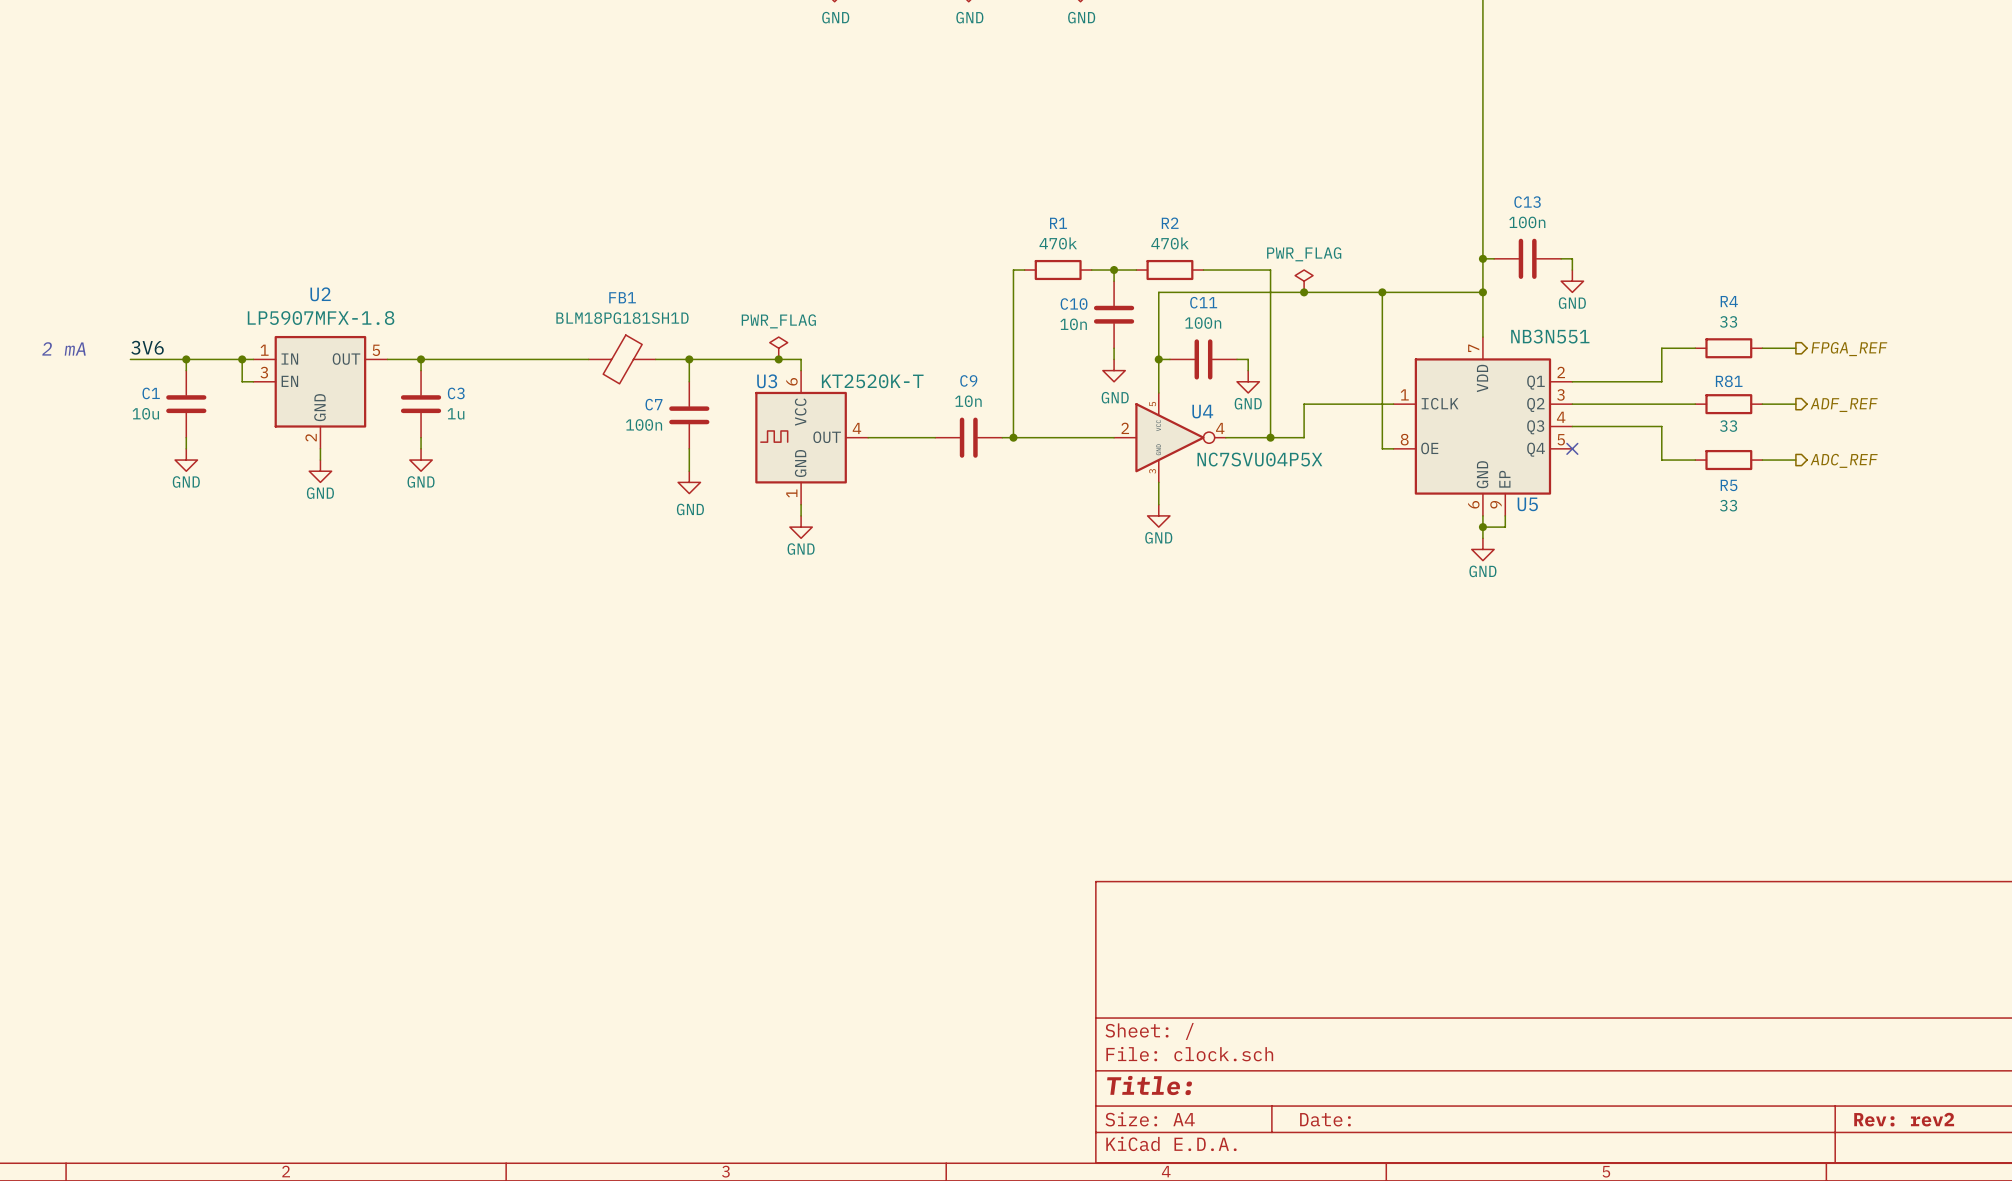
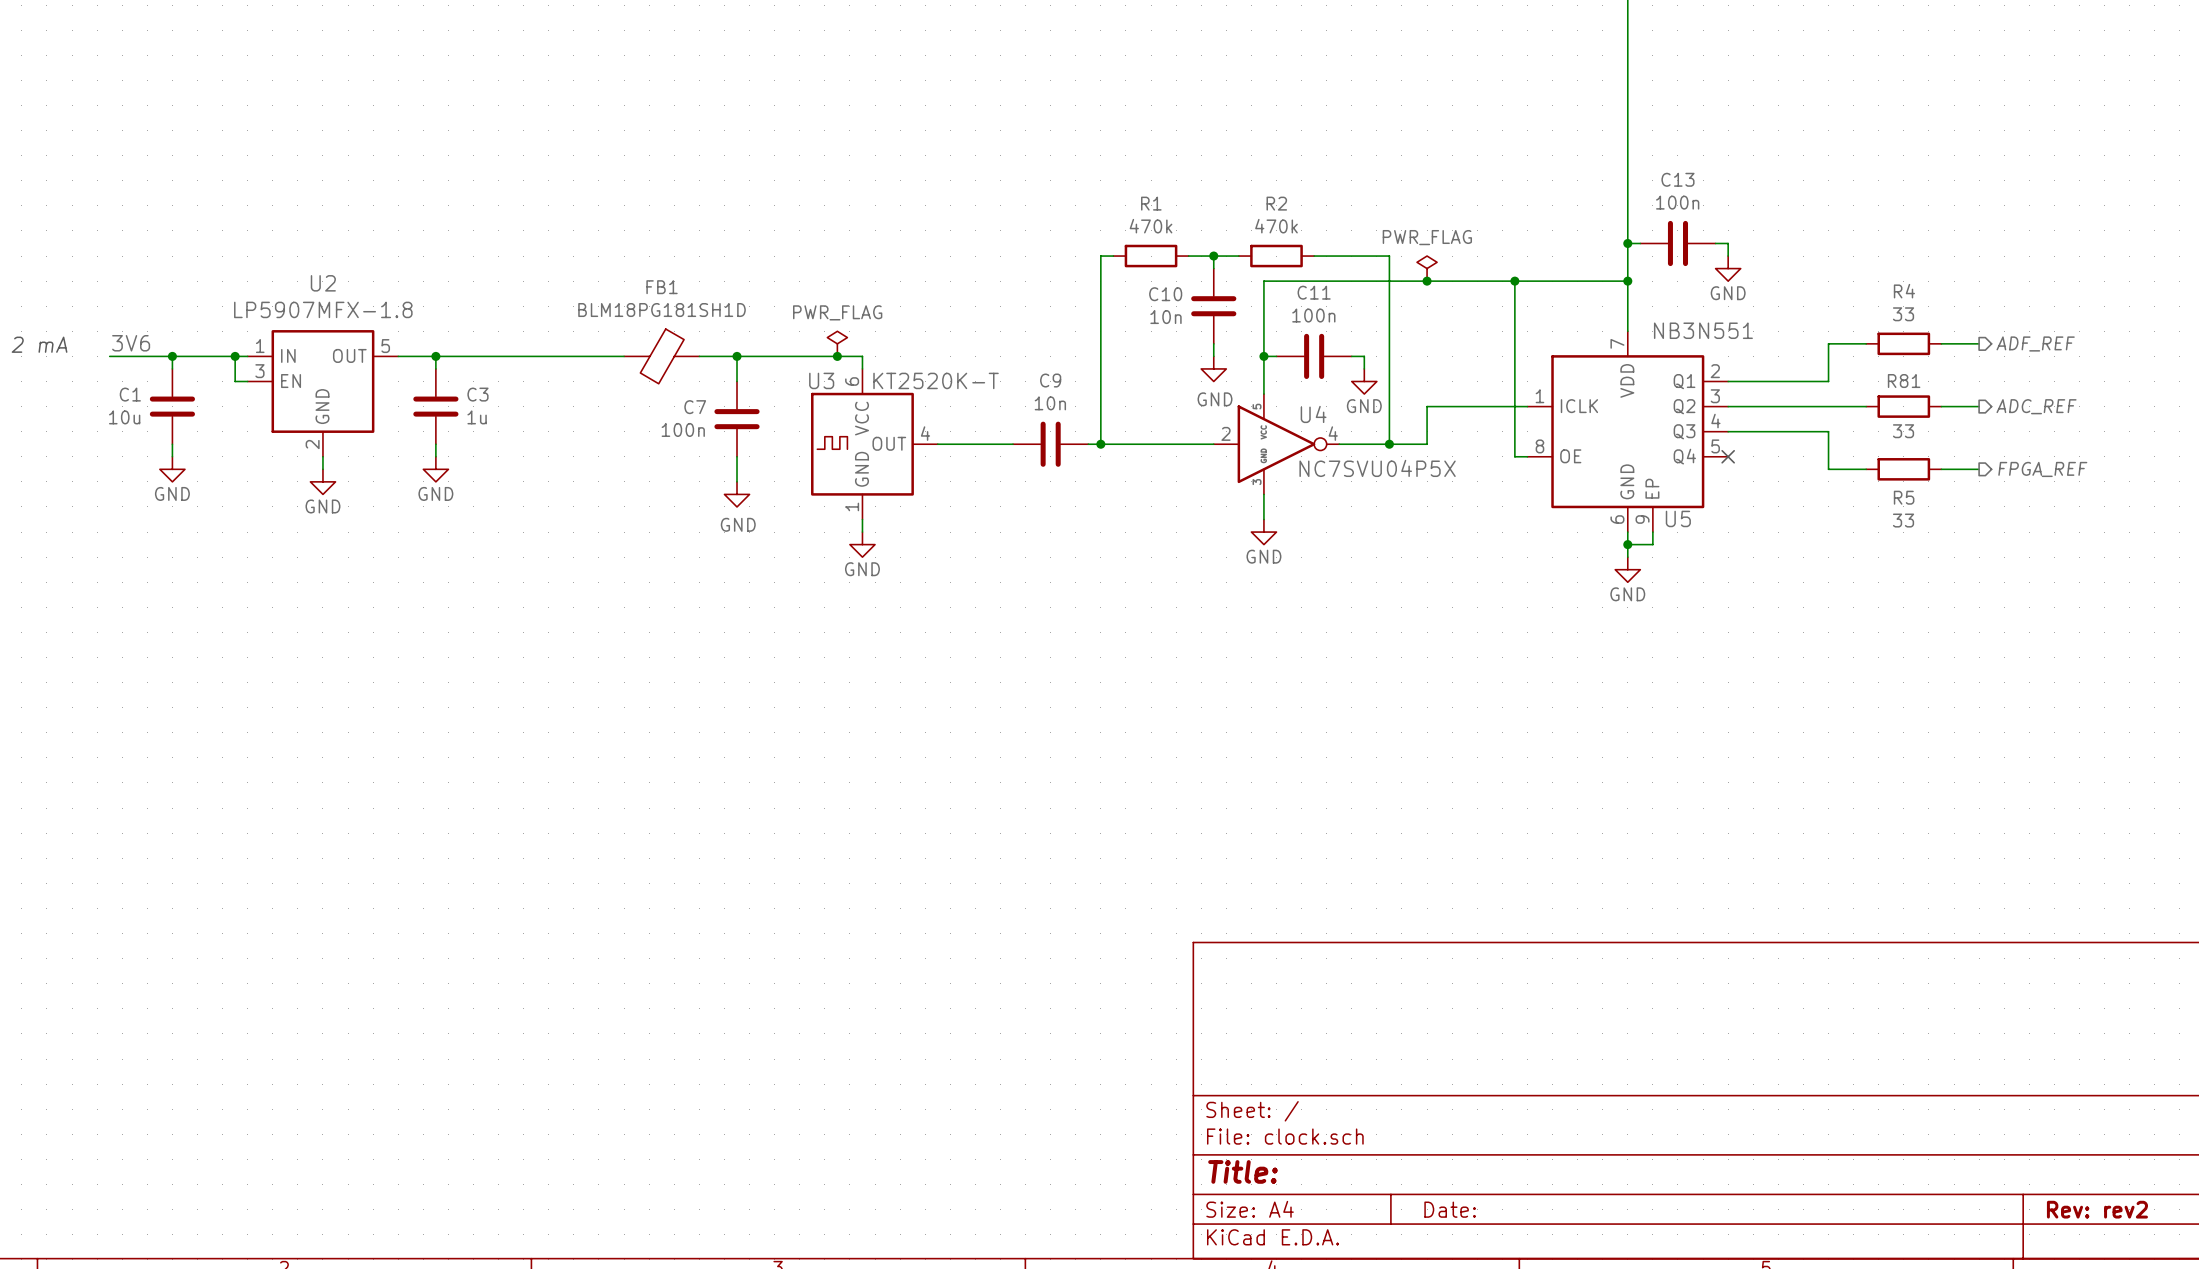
hierarchical label: FPGA_REF (1849, 349) -> ADF_REF (2035, 343)
hierarchical label: ADF_REF (1844, 405) -> ADC_REF (2036, 406)
hierarchical label: ADC_REF (1844, 460) -> FPGA_REF (2042, 469)

